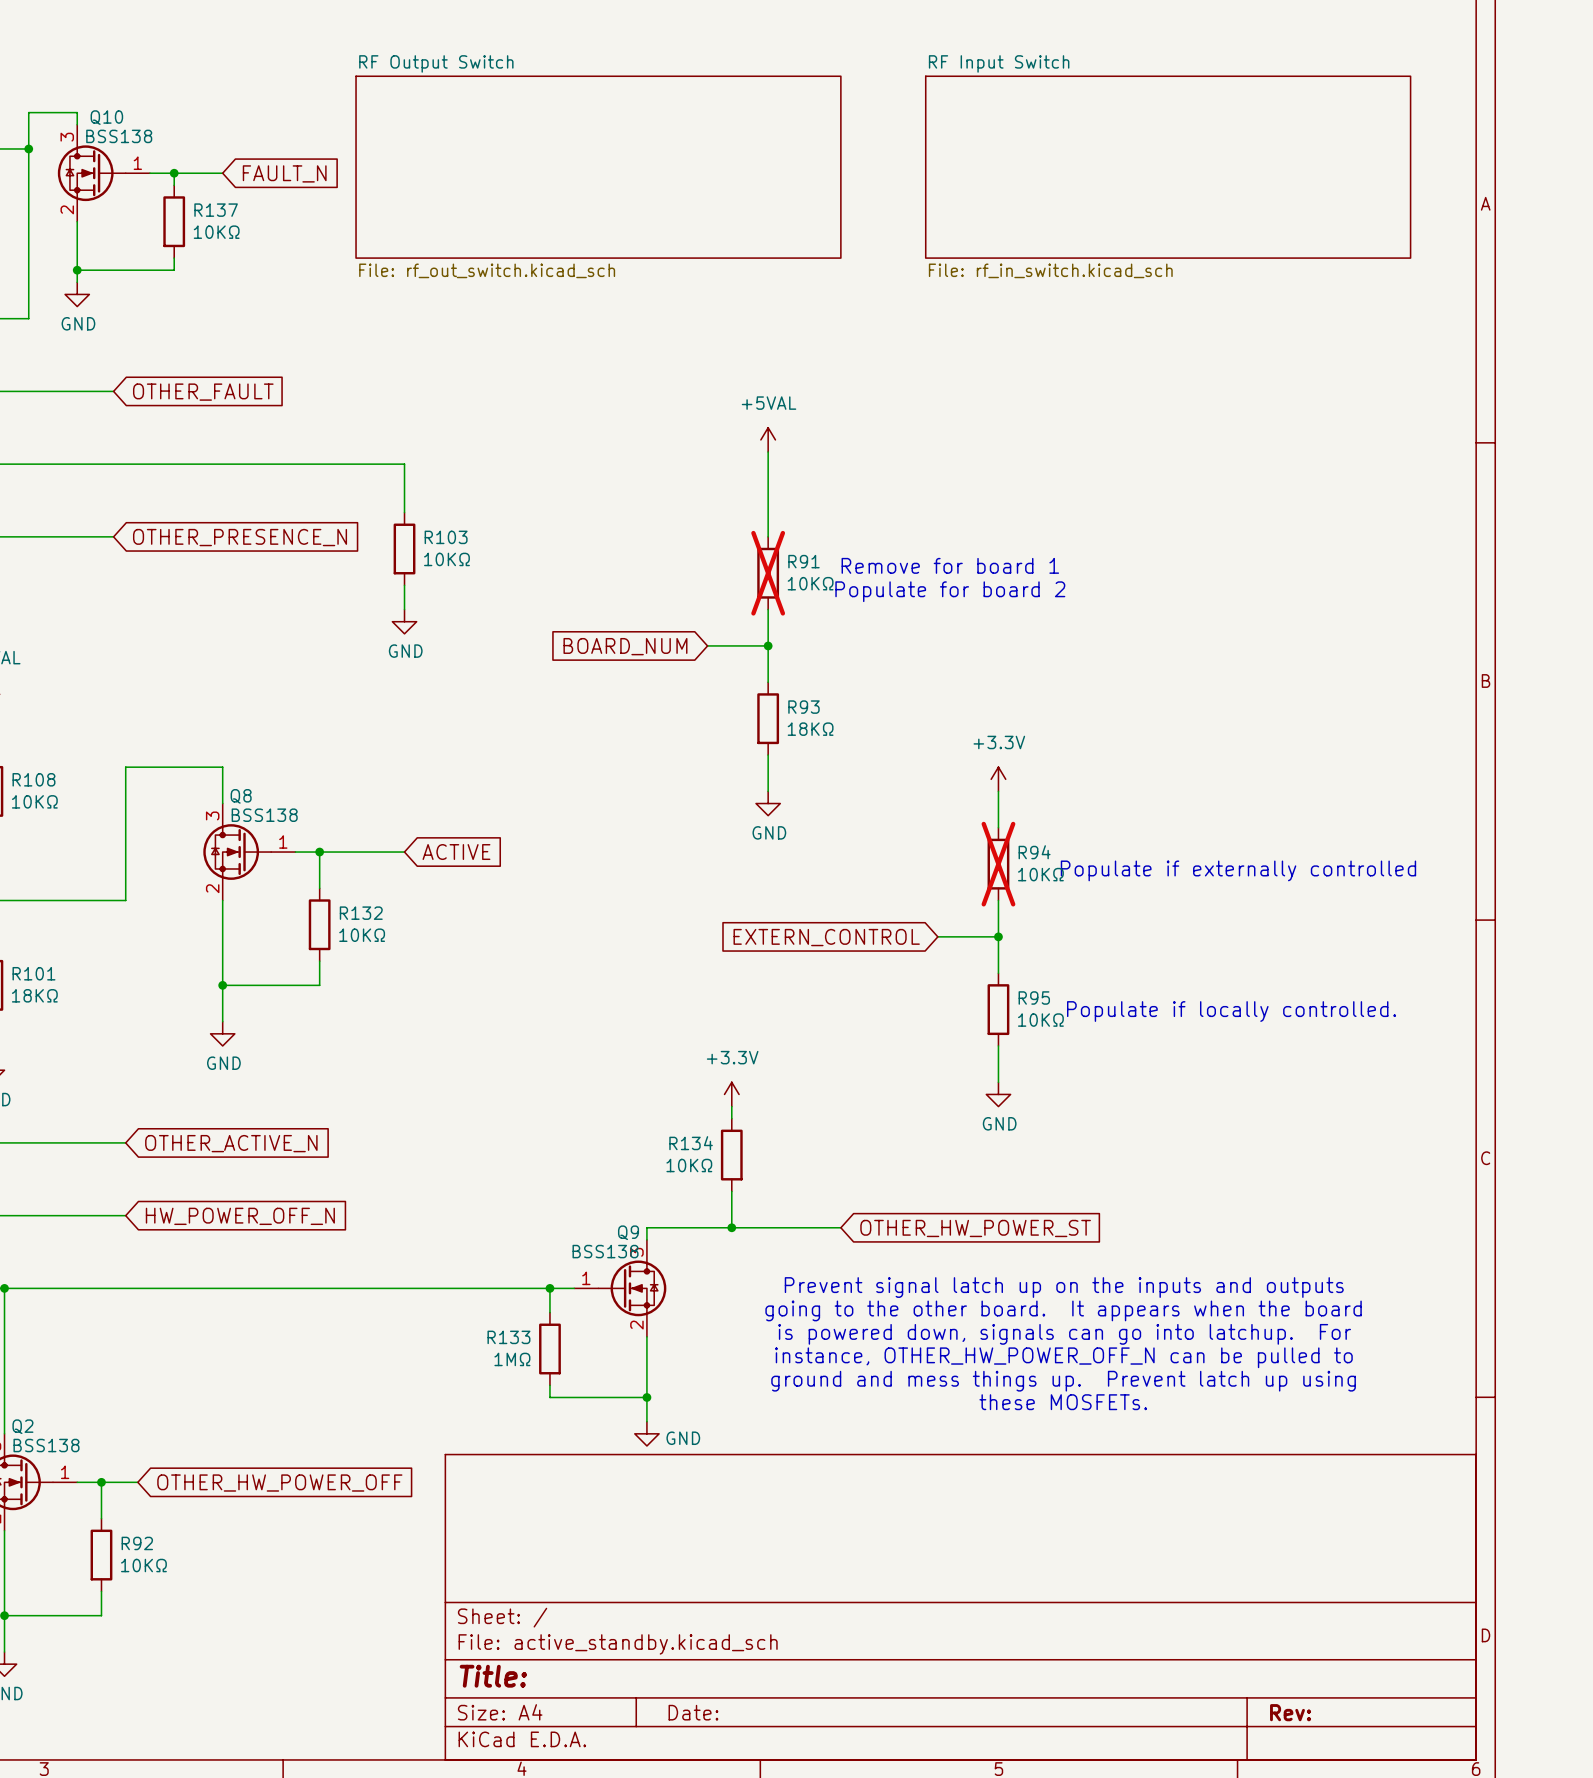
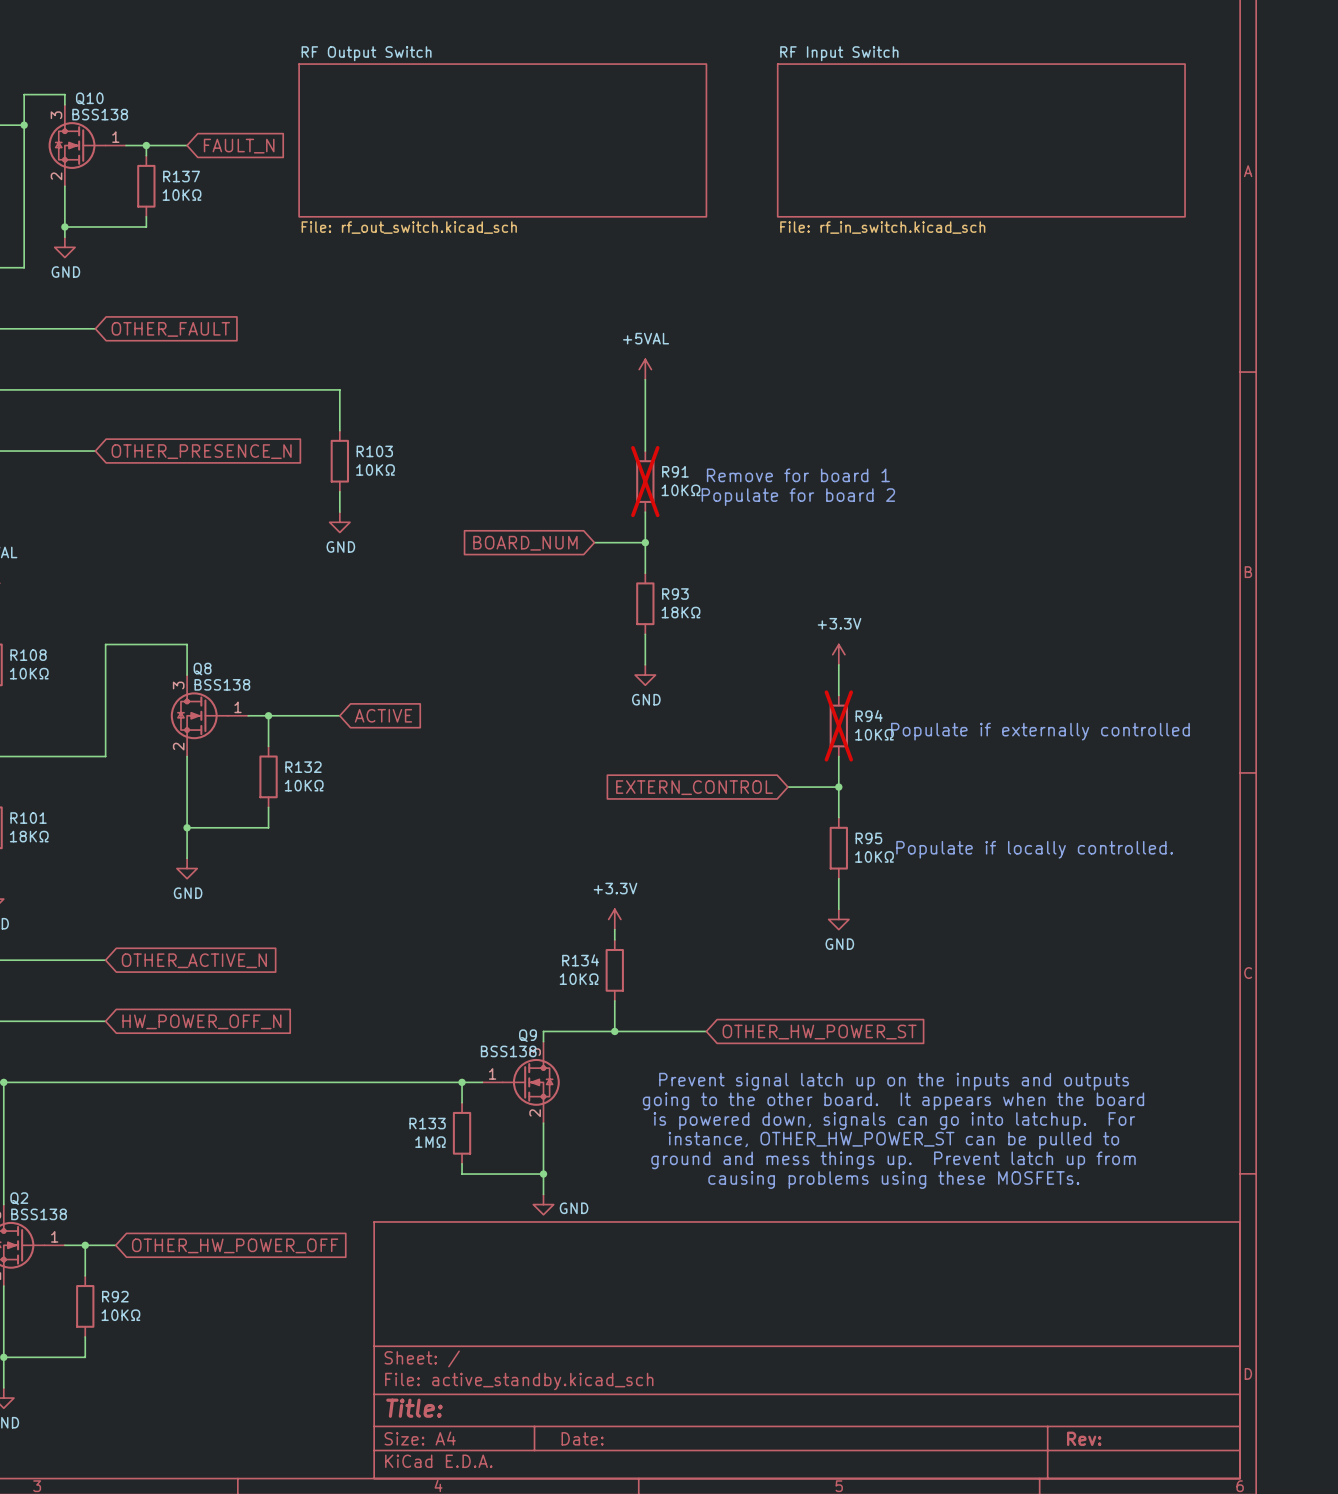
text: instance, OTHER_HW_POWER_OFF_N can be pulled to (1063, 1357) -> instance, OTHER_HW_POWER_ST can be pulled to (893, 1140)
text: ground and mess things up. Prevent latch up using (1063, 1381) -> ground and mess things up. Prevent latch up from (893, 1160)
text: these MOSFETs. (1063, 1402) -> causing problems using these MOSFETs. (893, 1180)

